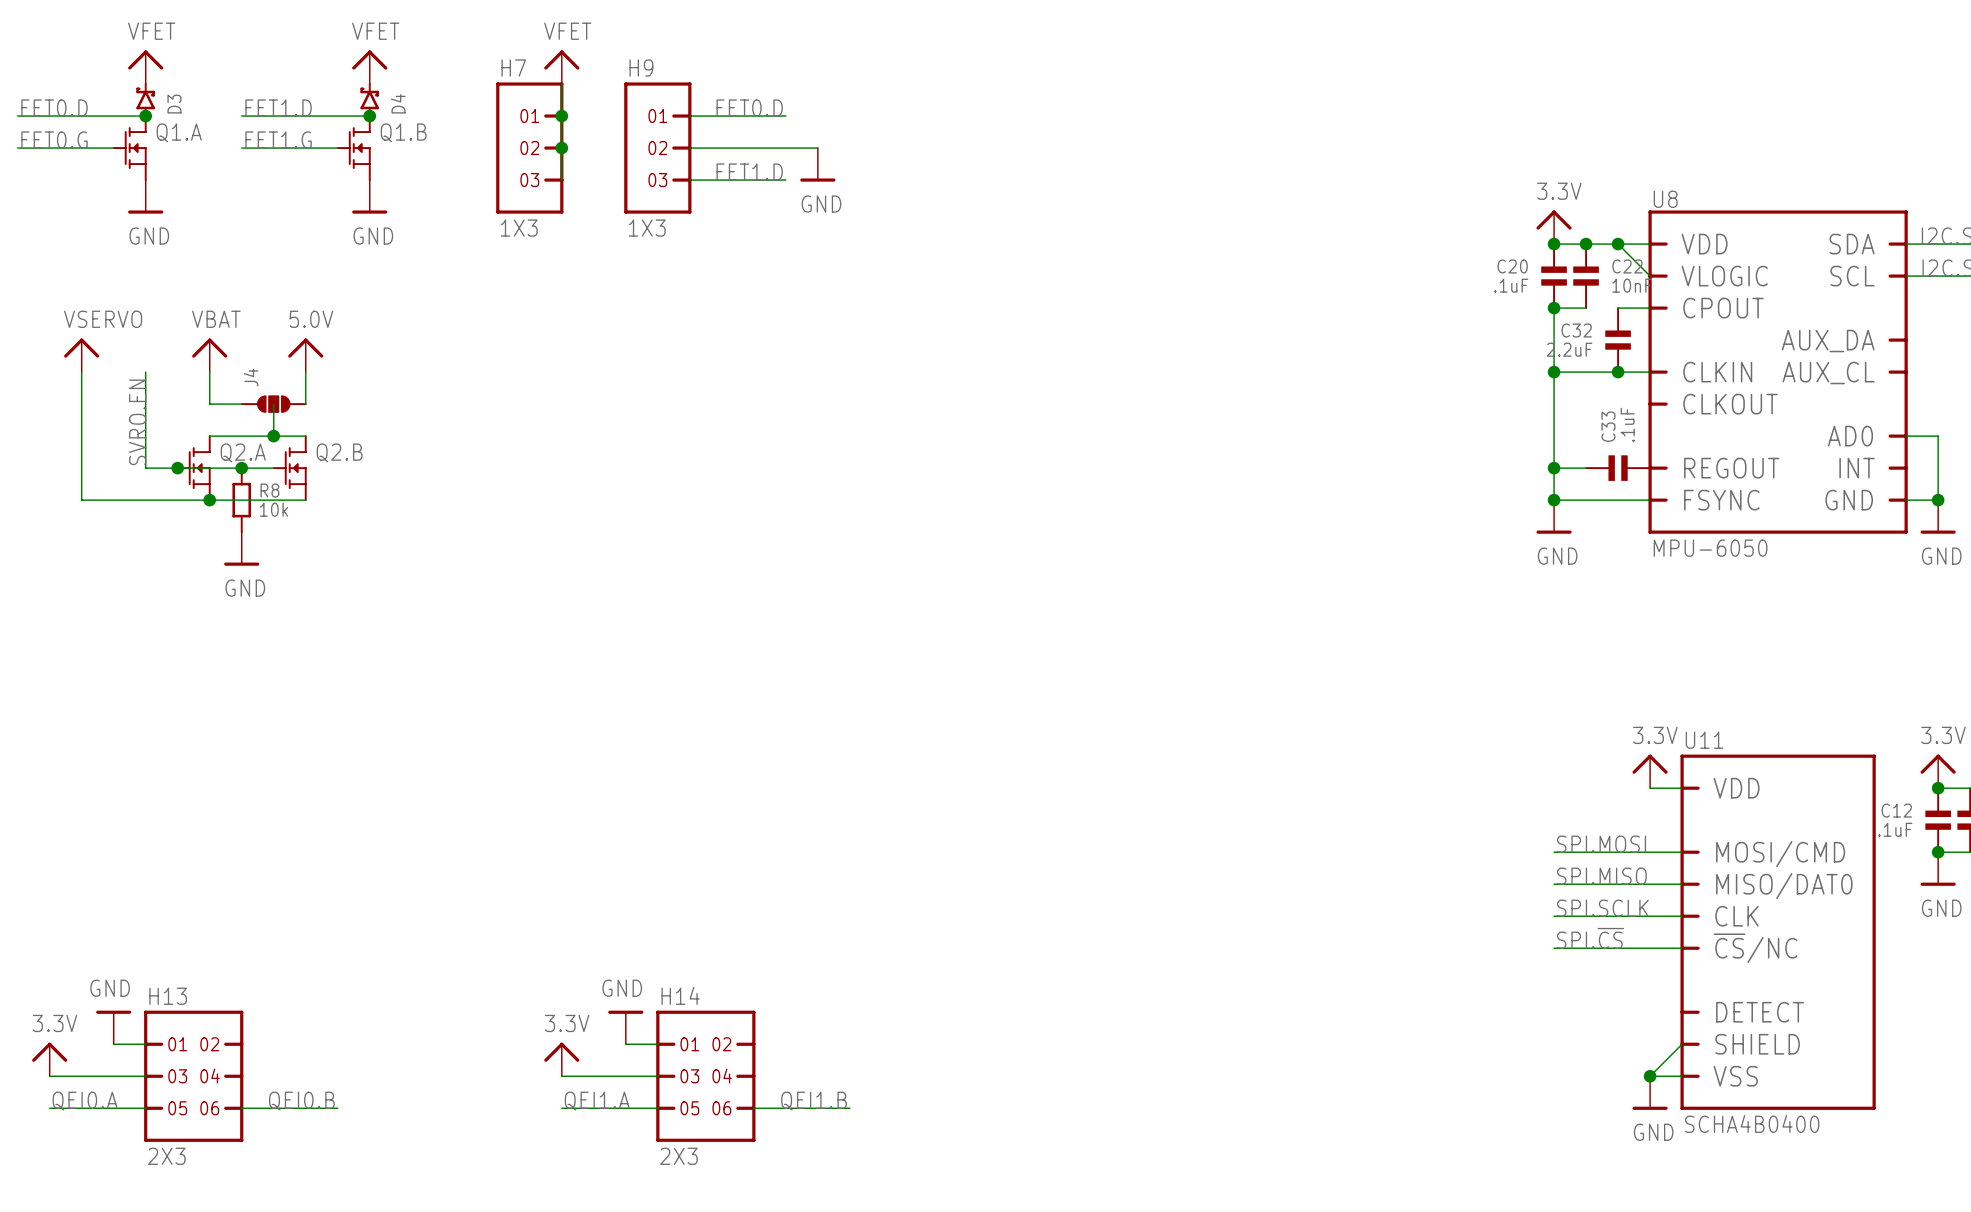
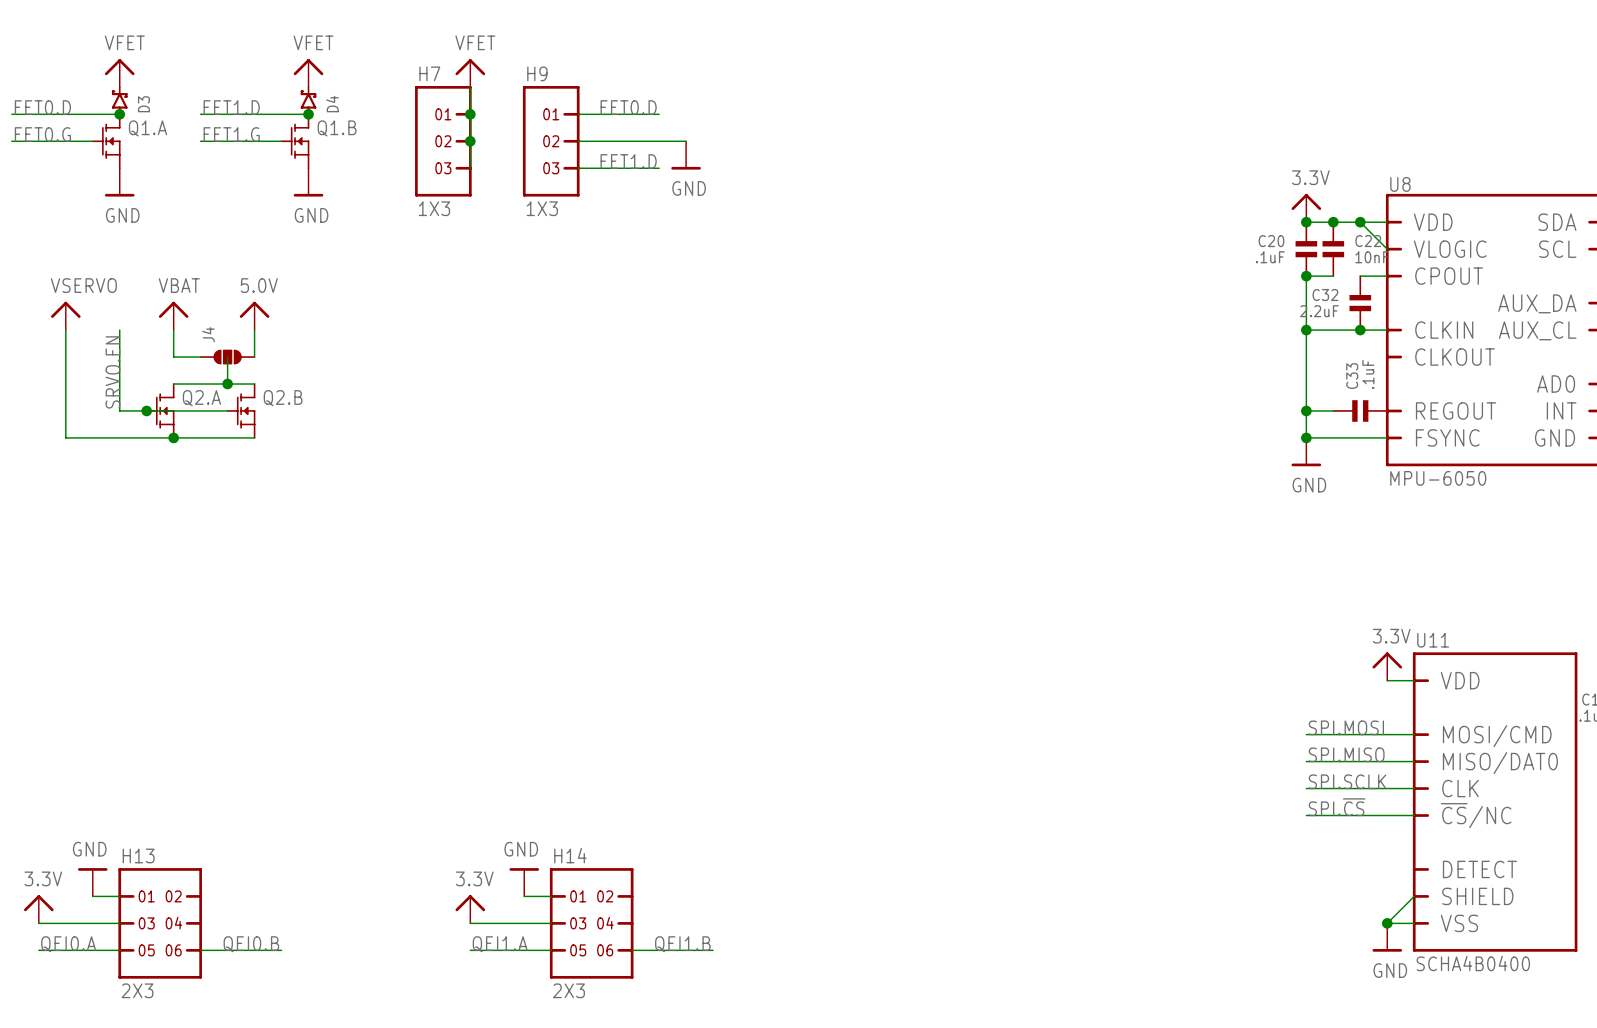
label: SVRO.EN (137, 422) -> SRVO.EN (112, 372)
junction: (241, 468) -> none
R8: 10k (241, 500) -> none
power symbol: GND (241, 548) -> none

